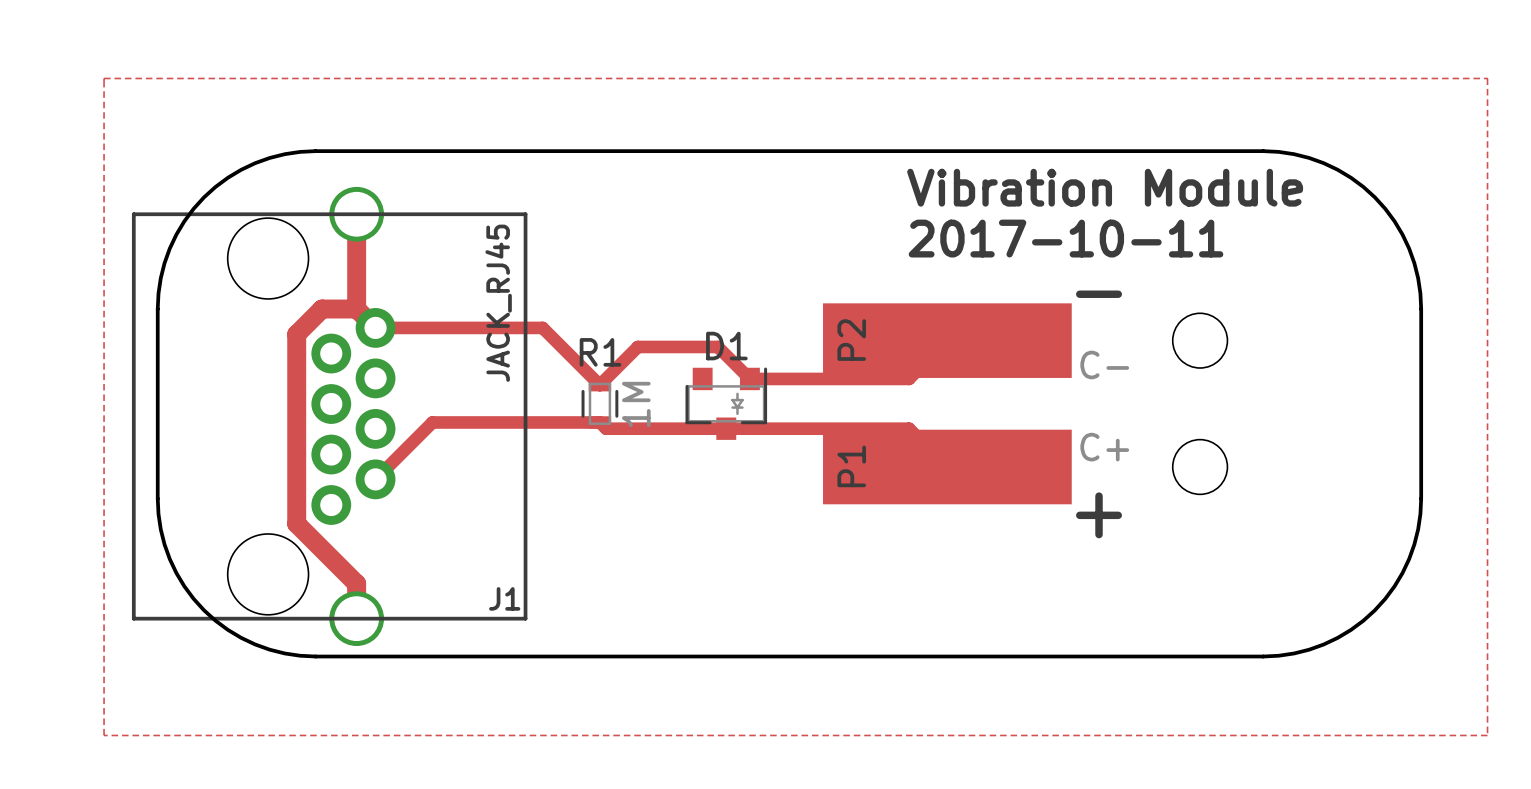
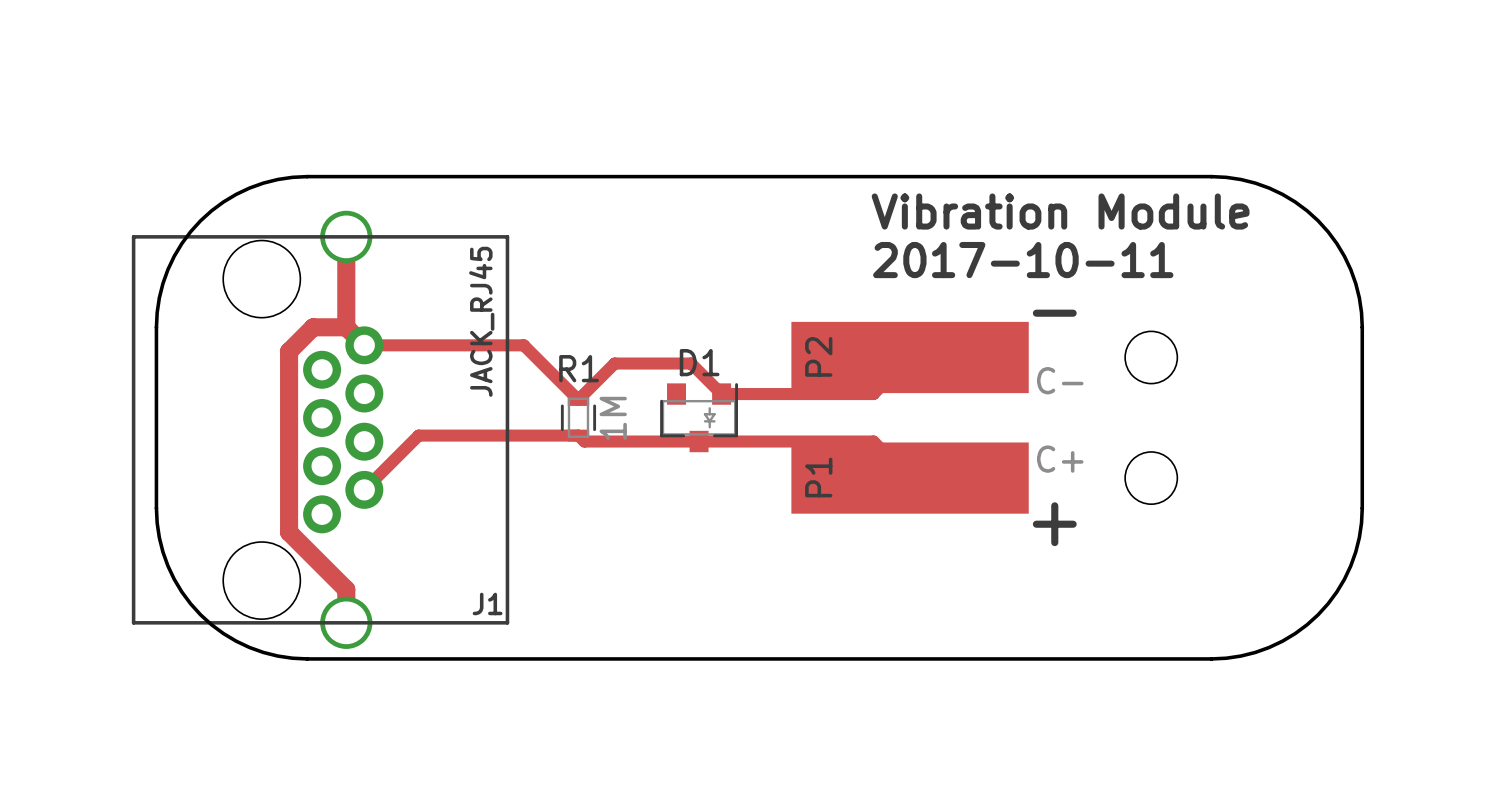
zone outline: (104, 78) (1487, 78) (1487, 735) (104, 735) (104, 78) -> none

